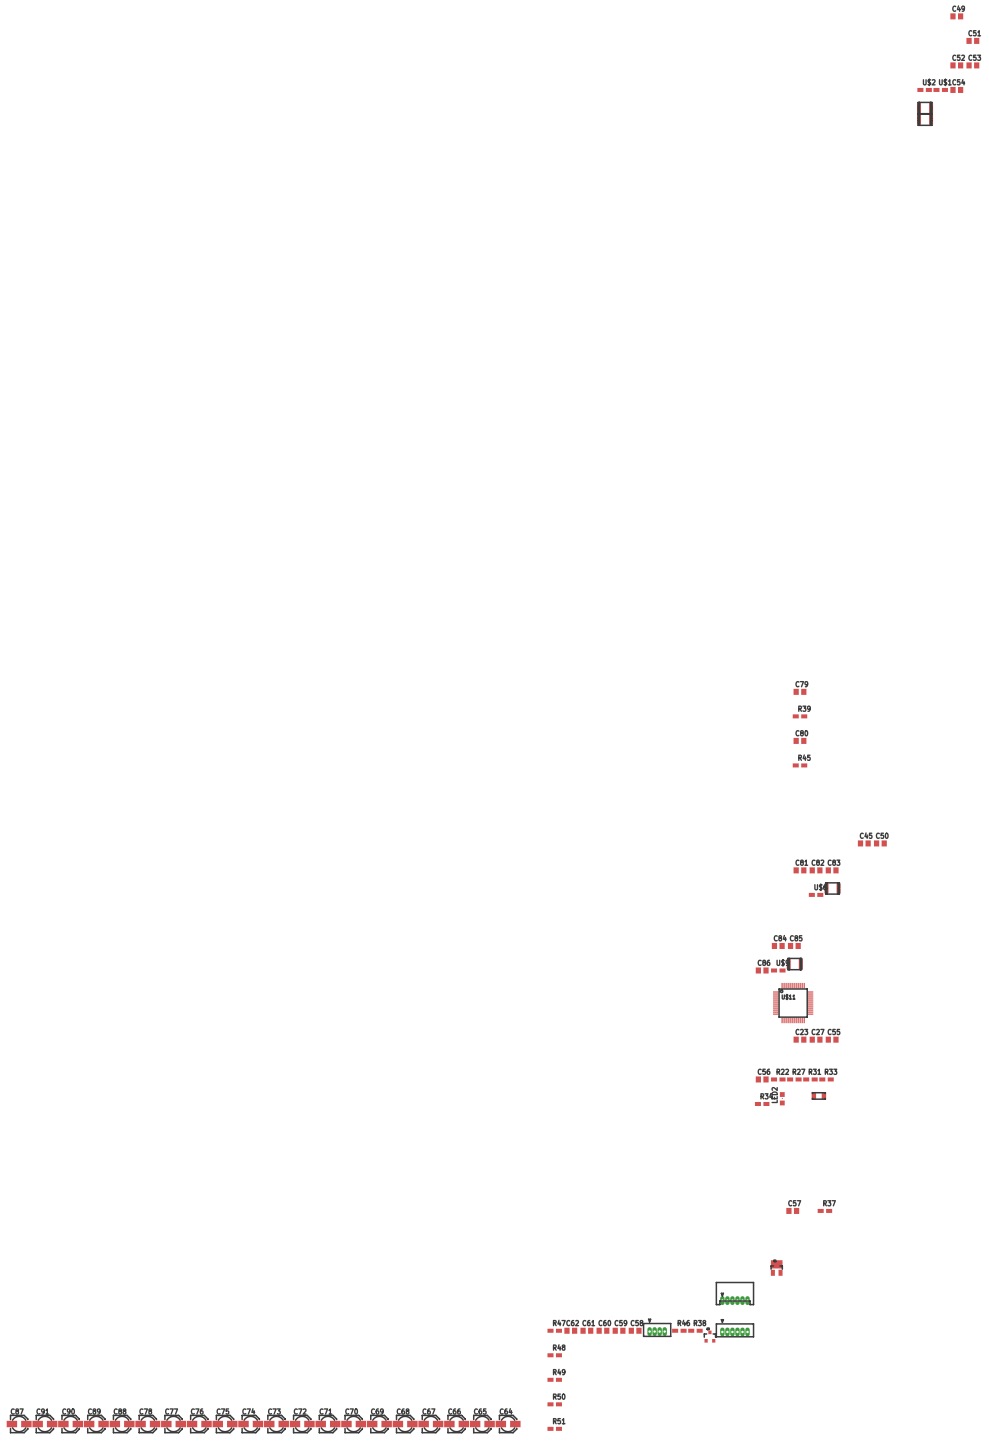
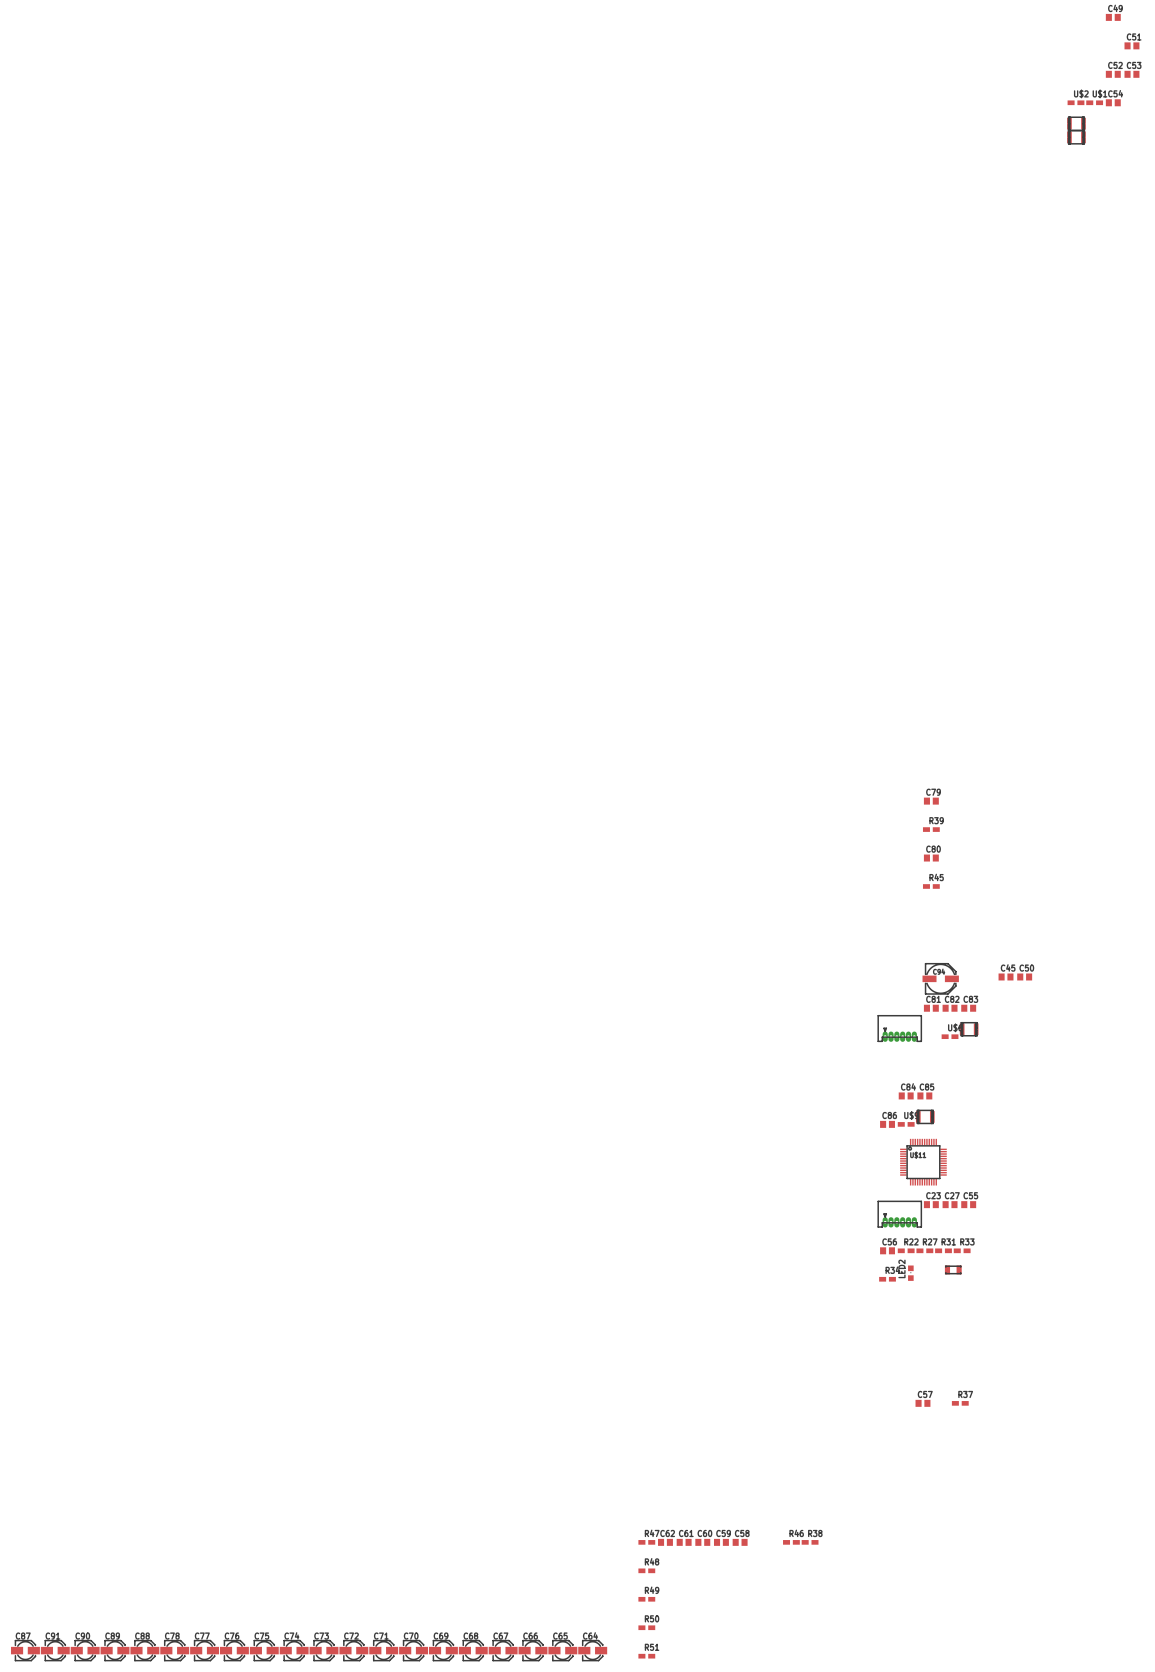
part: none -> (940, 978)
part: none -> (899, 1028)
part: none -> (899, 1214)
part: (776, 1268) -> none
part: (734, 1293) -> none
part: (657, 1327) -> none
part: (734, 1328) -> none
part: (709, 1336) -> none

